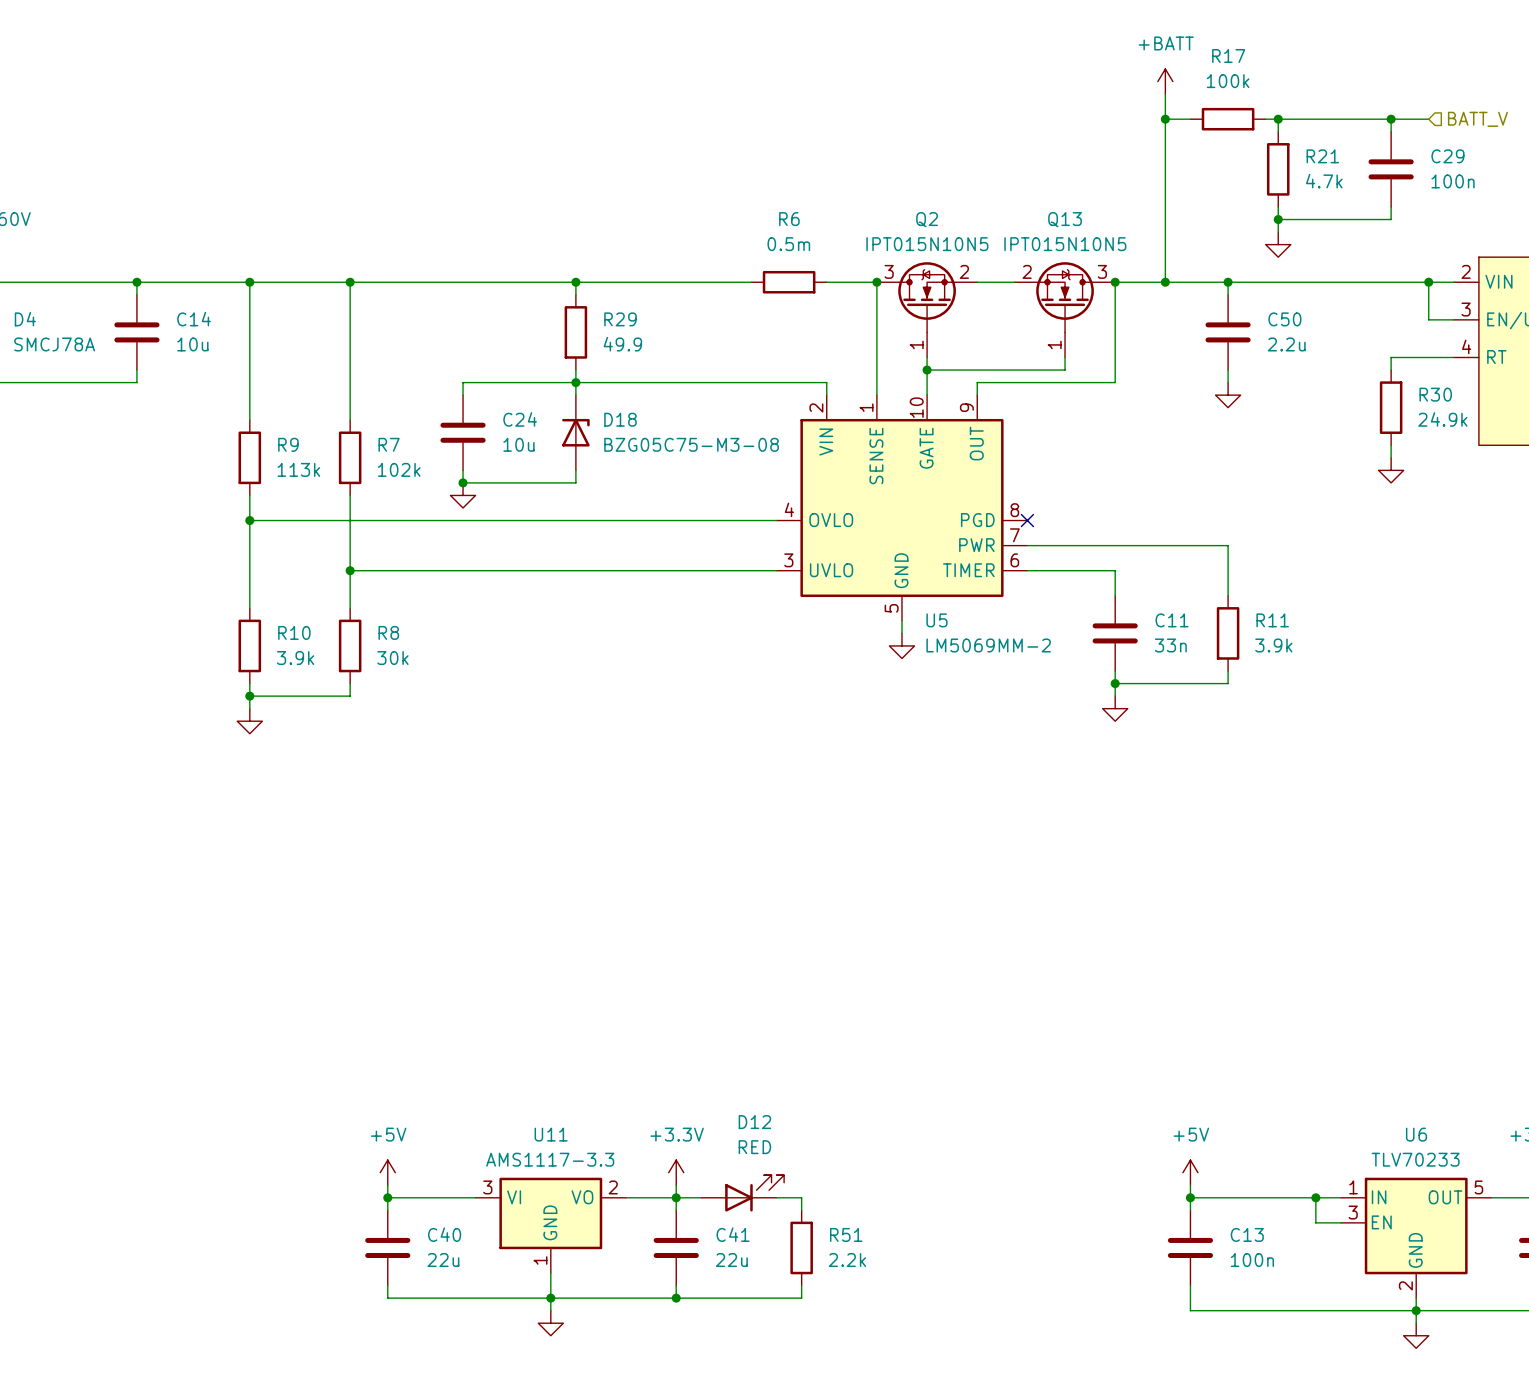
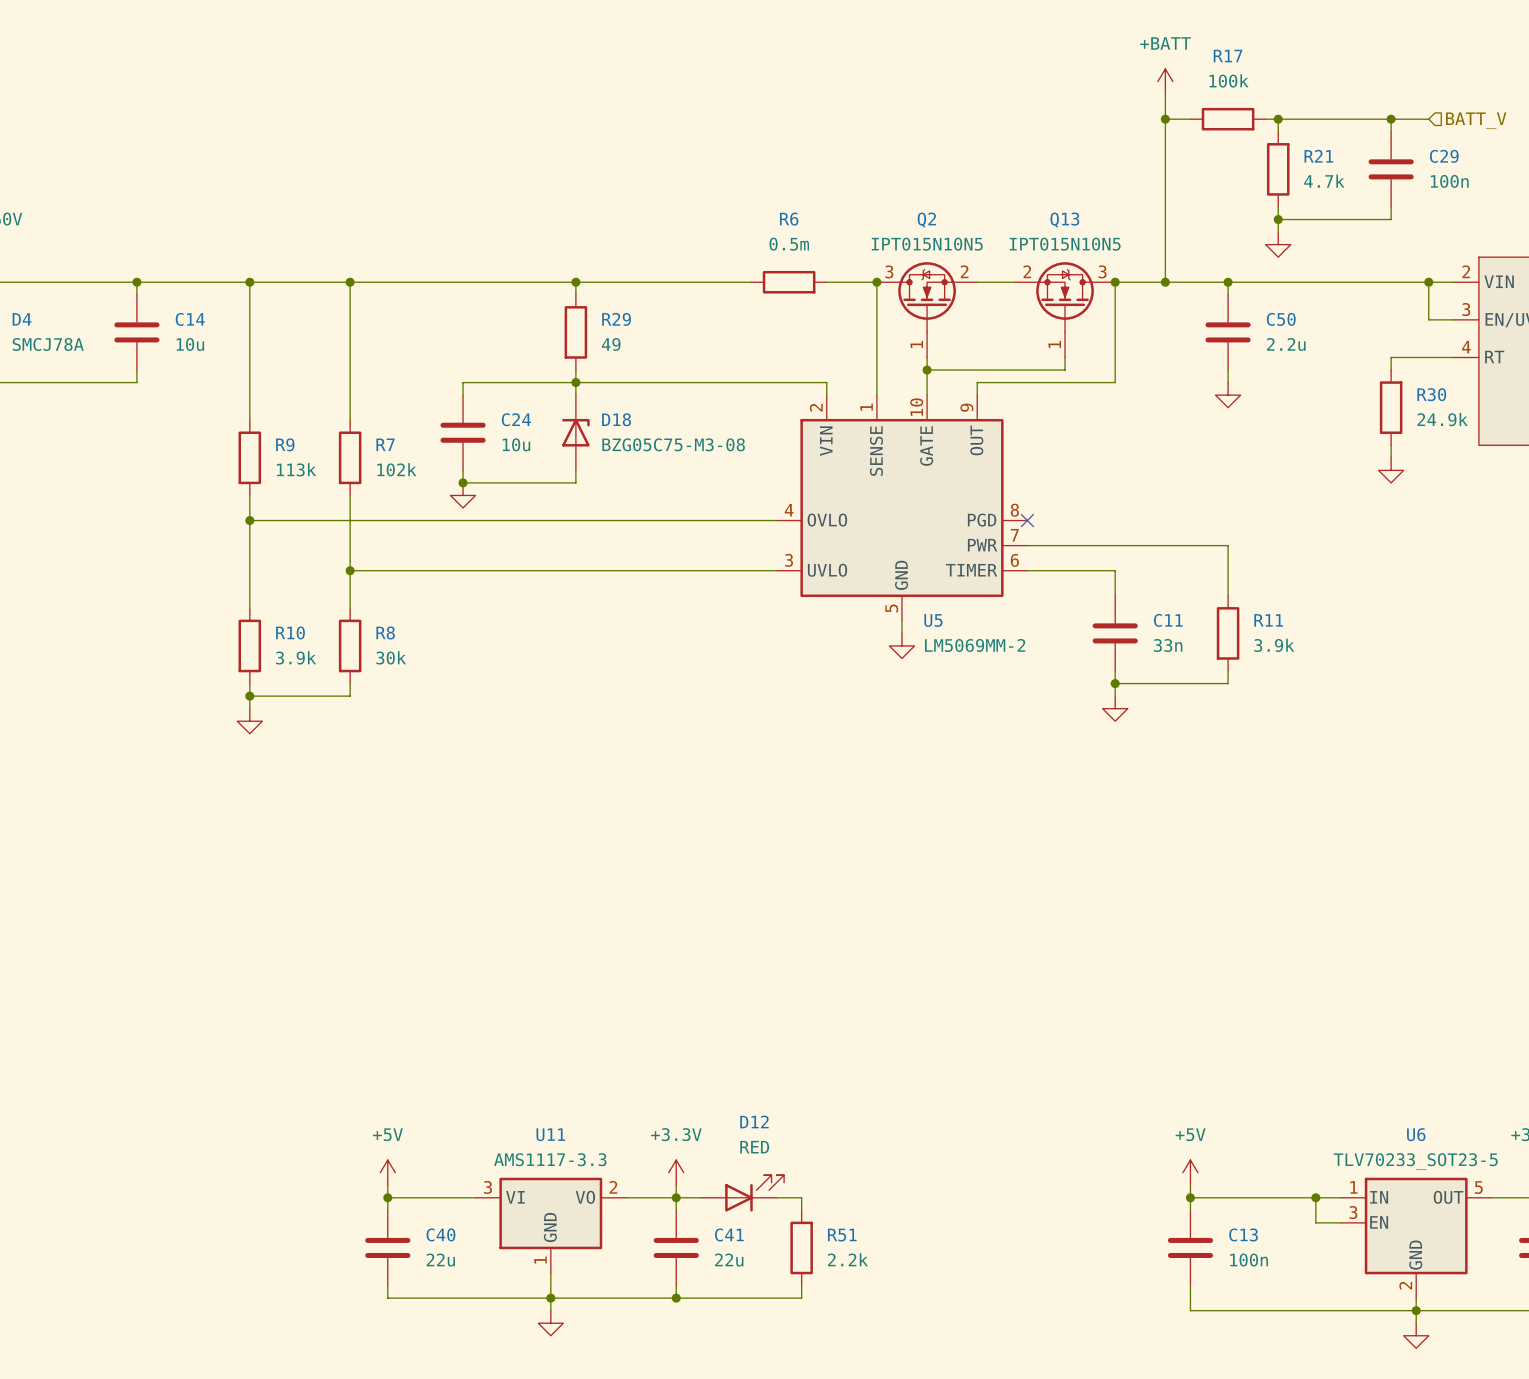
R29 value: 49.9 (622, 344) -> 49 (611, 344)
U6 value: TLV70233 (1415, 1159) -> TLV70233_SOT23-5 (1415, 1161)

